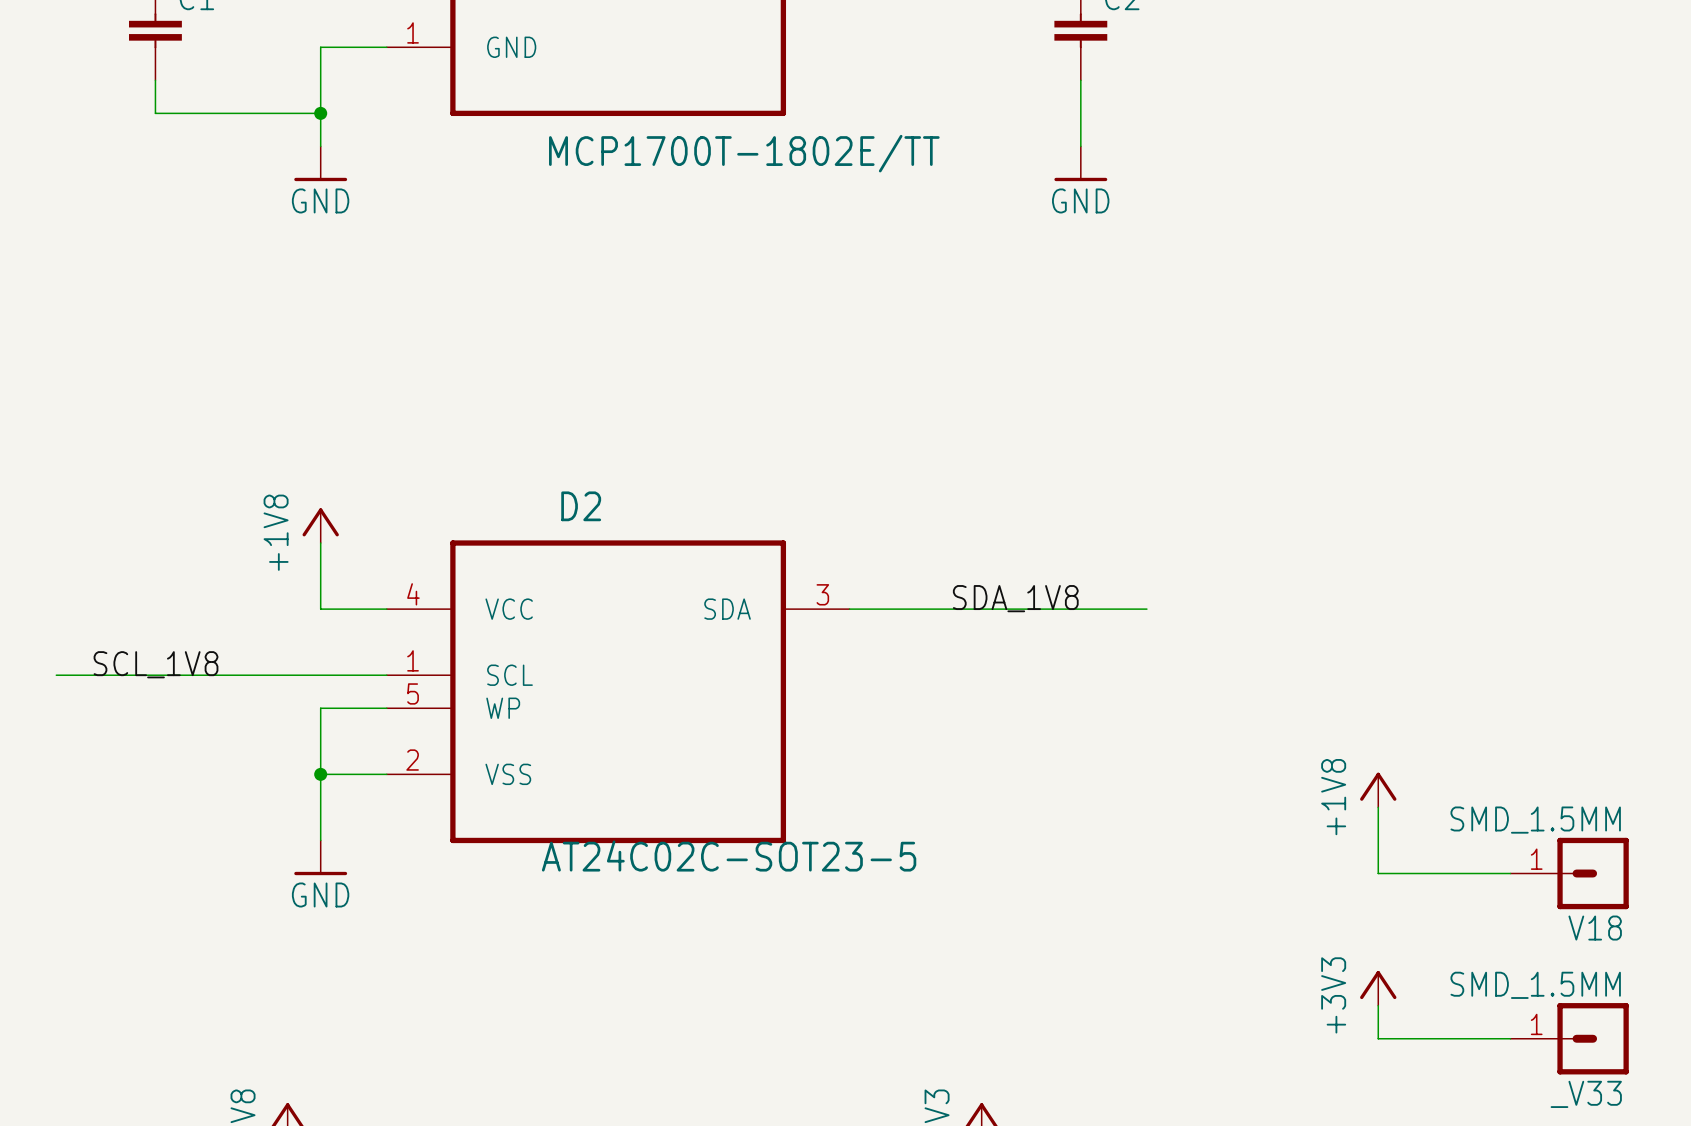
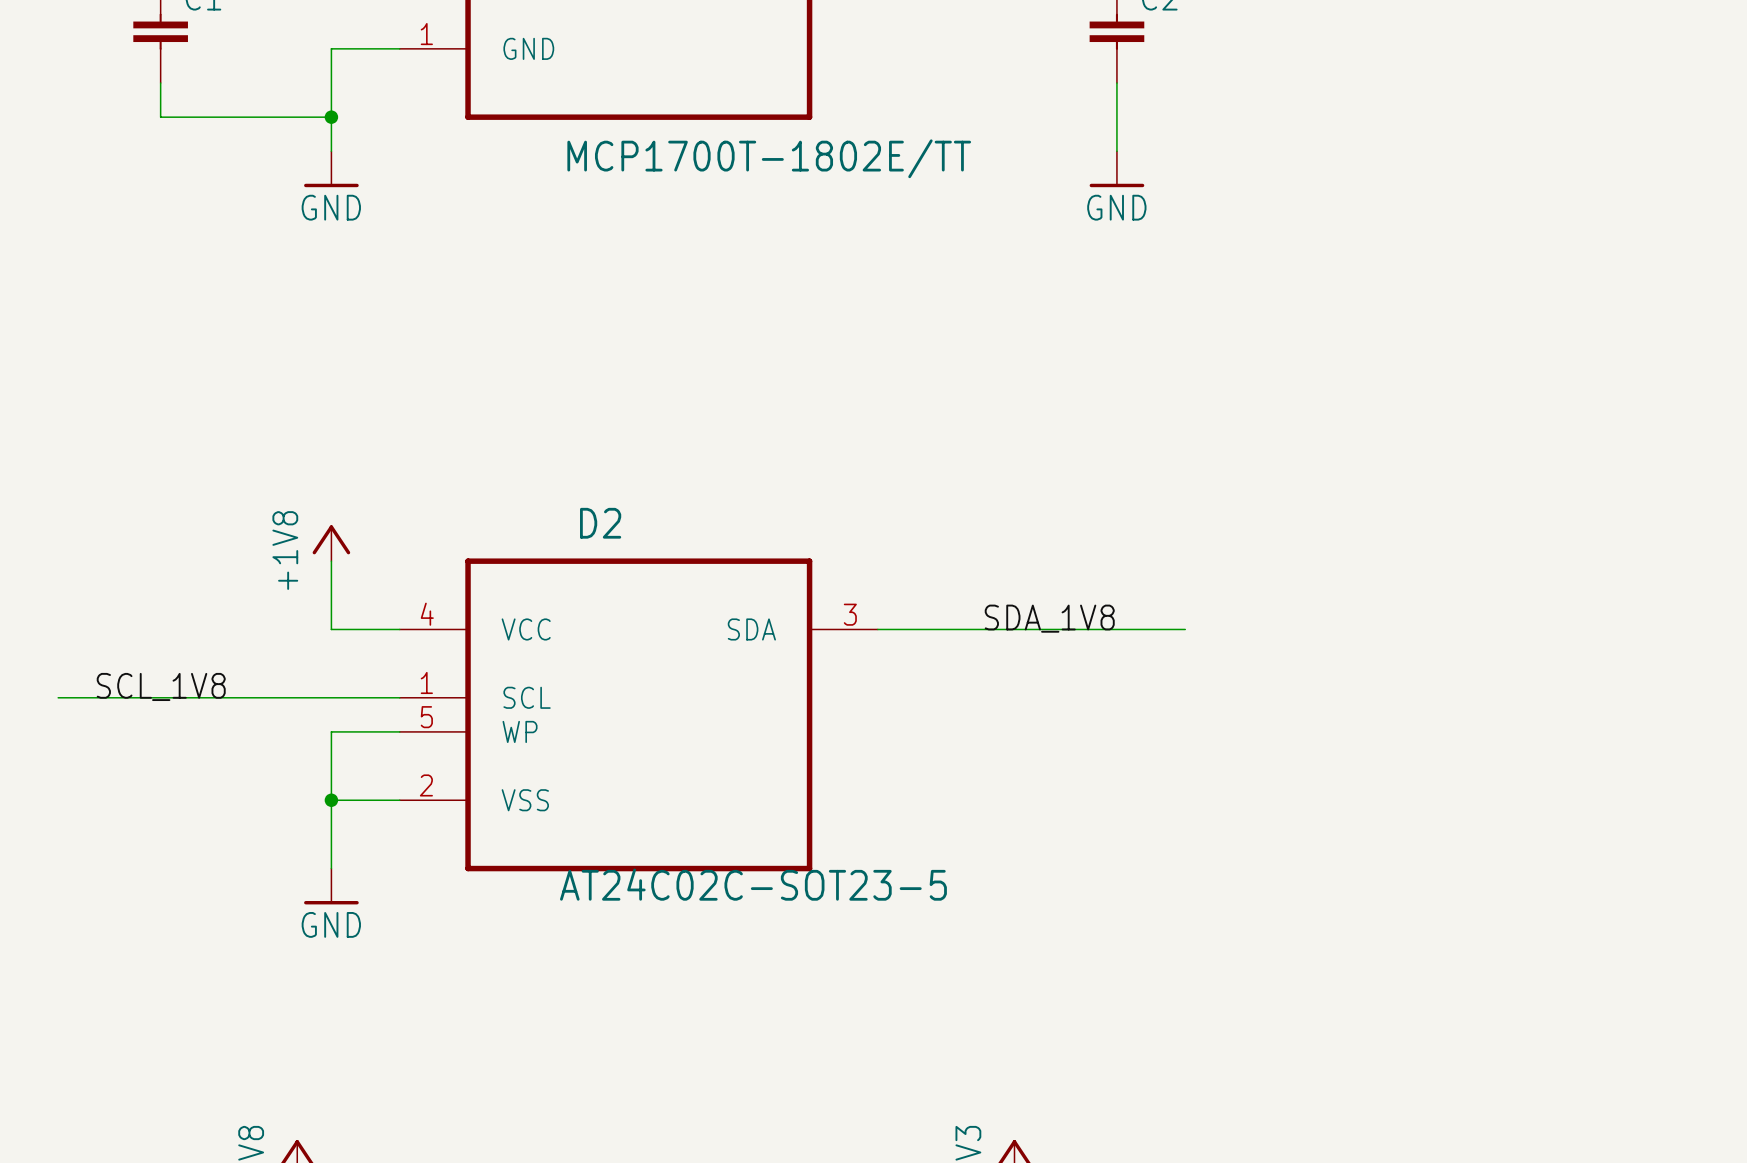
power symbol: +1V8 (1378, 790) -> none
wire: (1378, 807) (1378, 873) (1510, 873) -> none
V18: SMD_1.5MM (1569, 873) -> none
power symbol: +3V3 (1378, 988) -> none
wire: (1378, 1005) (1378, 1038) (1510, 1038) -> none
_V33: SMD_1.5MM (1569, 1038) -> none

